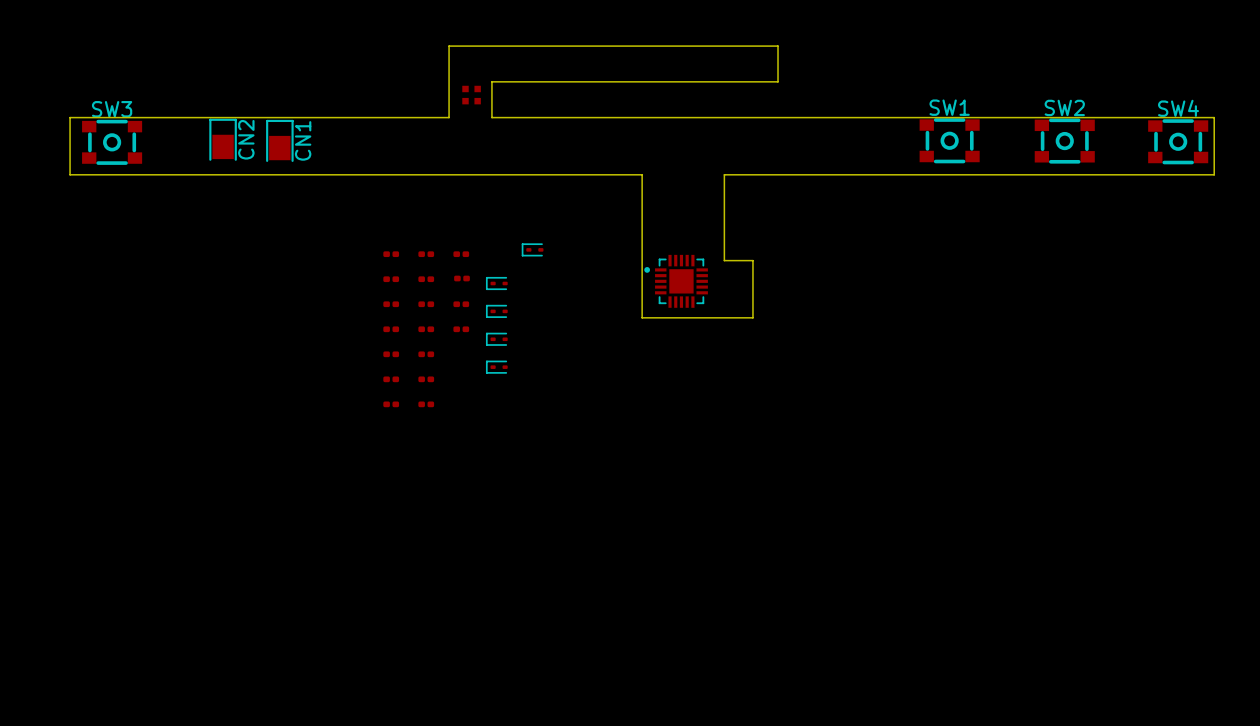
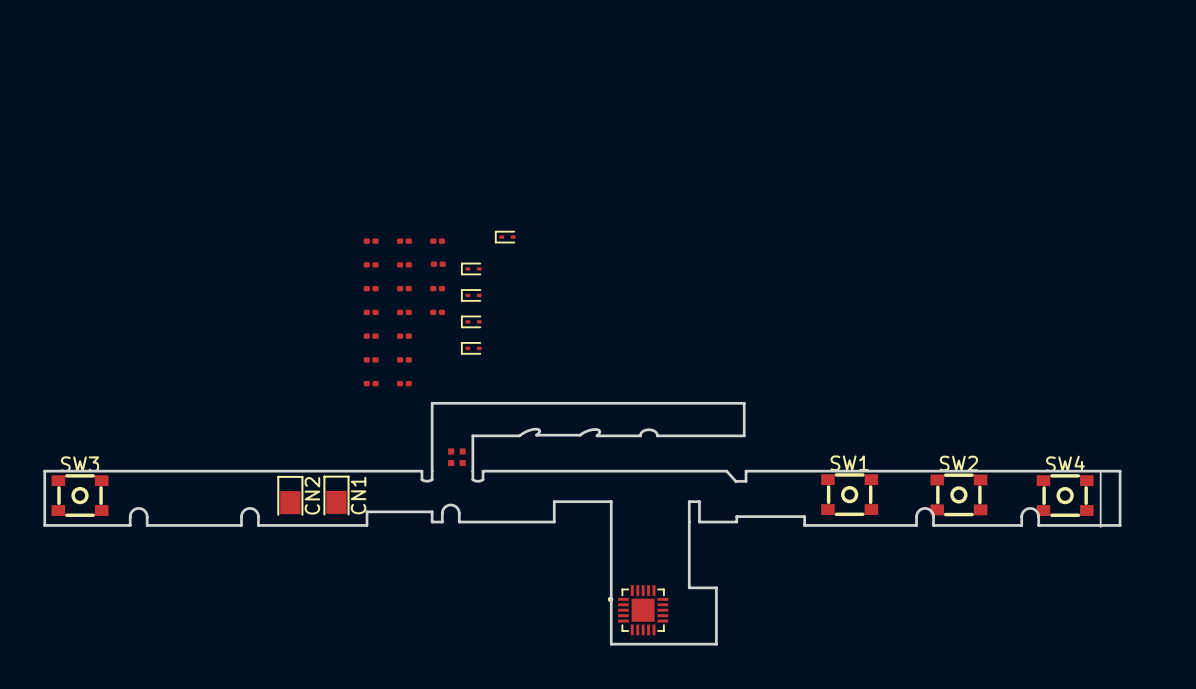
board edge: (449, 46) (449, 117) (70, 117) (70, 174) (642, 174) (642, 317) (752, 317) (752, 260) (724, 260) (724, 174) (1214, 174) (1214, 117) (491, 117) (491, 81) (778, 81) (778, 46) (449, 46) -> none
part: (471, 95) -> none
CN2 position: (223, 139) -> (290, 495)
CN1 position: (279, 140) -> (336, 495)
SW1 position: (949, 140) -> (849, 494)
SW2 position: (1064, 141) -> (958, 494)
SW4 position: (1178, 141) -> (1065, 495)
SW3 position: (112, 142) -> (80, 495)
part: (676, 281) -> none
board edge: none -> (432, 403) (432, 479) (430, 480) (421, 479) (421, 471) (44, 471) (44, 525) (130, 525) (131, 512) (138, 508) (146, 512) (147, 525) (241, 525) (242, 512) (249, 508) (257, 512) (258, 525) (367, 525) (367, 511) (432, 511) (432, 522) (442, 522) (443, 509) (450, 505) (458, 509) (459, 522) (554, 522) (554, 501) (611, 501) (611, 644) (716, 644) (716, 587) (689, 587) (689, 501) (699, 501) (699, 522) (736, 522) (736, 516) (804, 516) (804, 525) (916, 525) (917, 512) (925, 508) (932, 512) (933, 525) (1021, 525) (1022, 512) (1030, 508) (1037, 512) (1038, 525) (1120, 525) (1120, 471) (746, 471) (746, 481) (735, 481) (726, 471) (483, 471) (483, 479) (476, 481) (472, 479) (472, 435) (519, 435) (535, 429) (539, 430) (536, 435) (580, 435) (595, 429) (599, 431) (597, 435) (640, 435) (643, 431) (648, 429) (654, 431) (657, 435) (744, 435) (744, 403) (432, 403)
part: none -> (456, 457)
board edge: none -> (1100, 472) (1100, 526)
part: none -> (638, 610)

